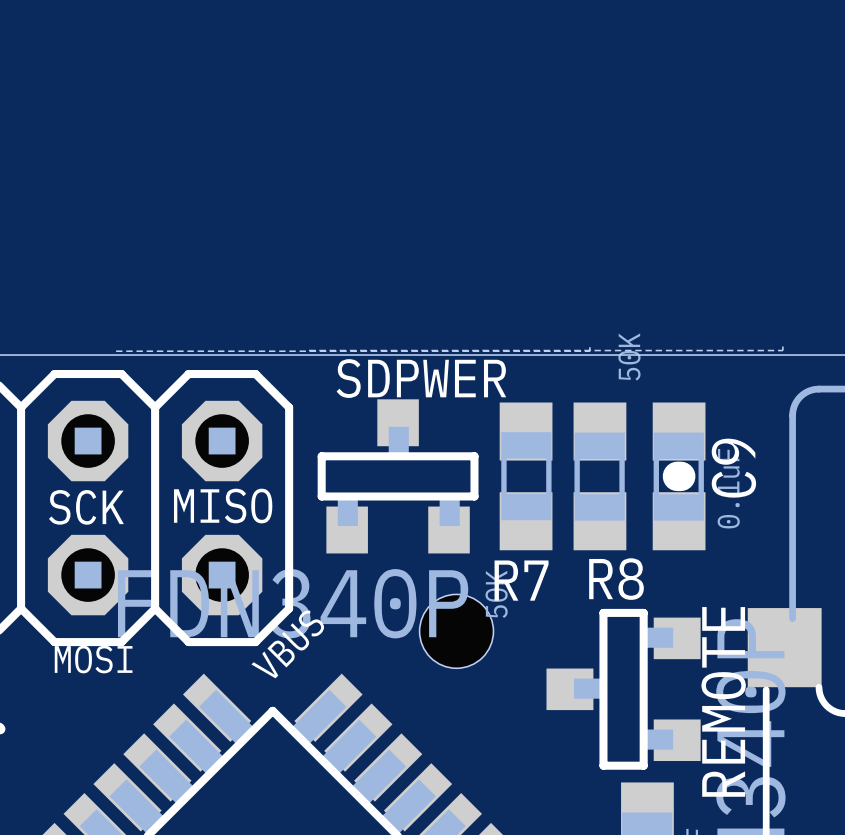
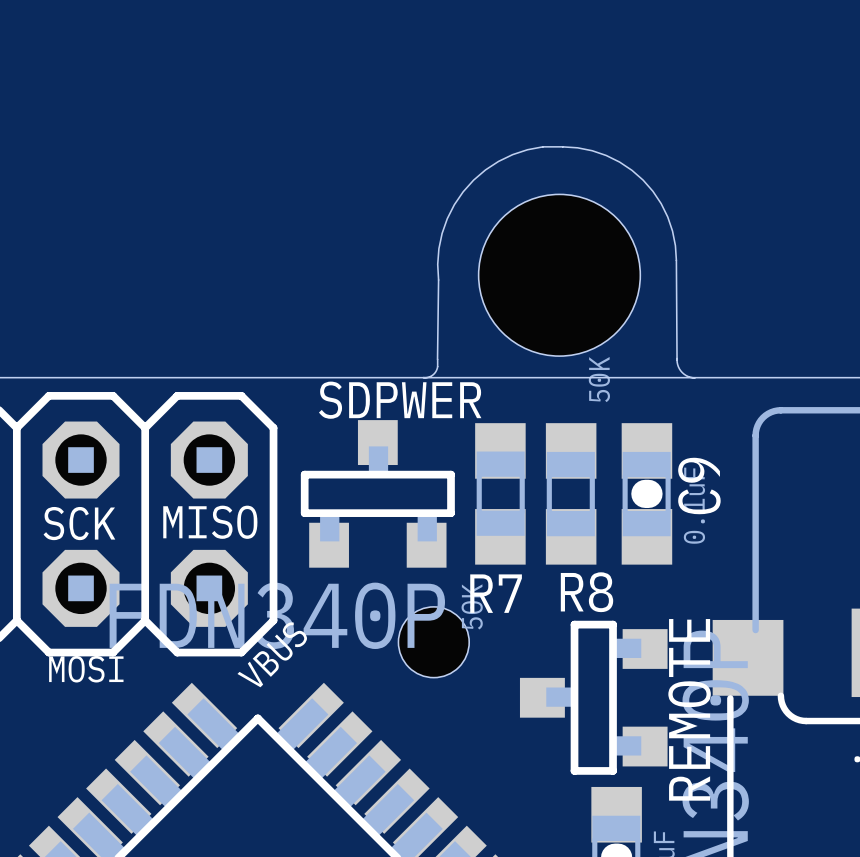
hole: none -> (559, 275)
board edge: (782, 346) (782, 350) (309, 350) -> none
board edge: (589, 347) (589, 351) (116, 351) -> none
board edge: none -> (423, 377) (432, 375) (437, 366) (438, 248) (447, 218) (454, 204) (473, 180) (498, 161) (527, 149) (542, 146) (562, 146) (592, 150) (619, 162) (643, 180) (661, 203) (667, 216) (675, 245) (677, 362) (684, 374) (695, 377)

